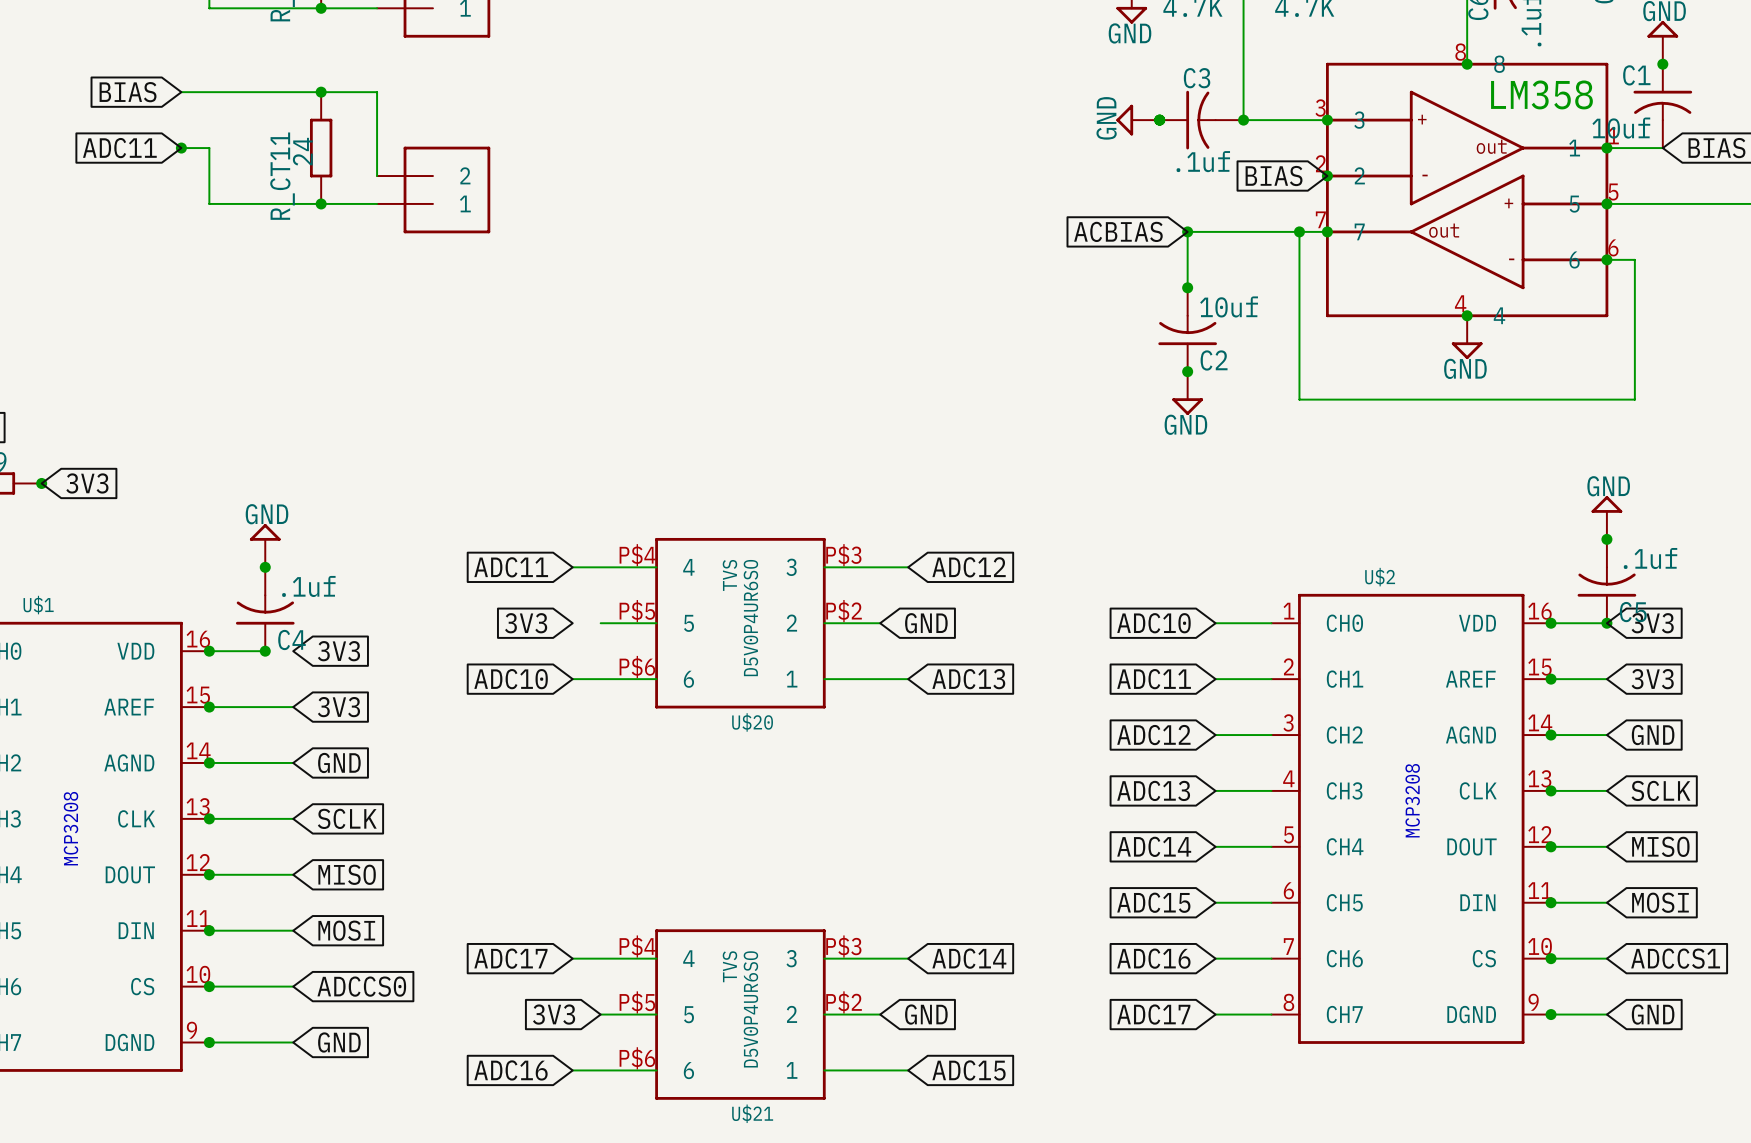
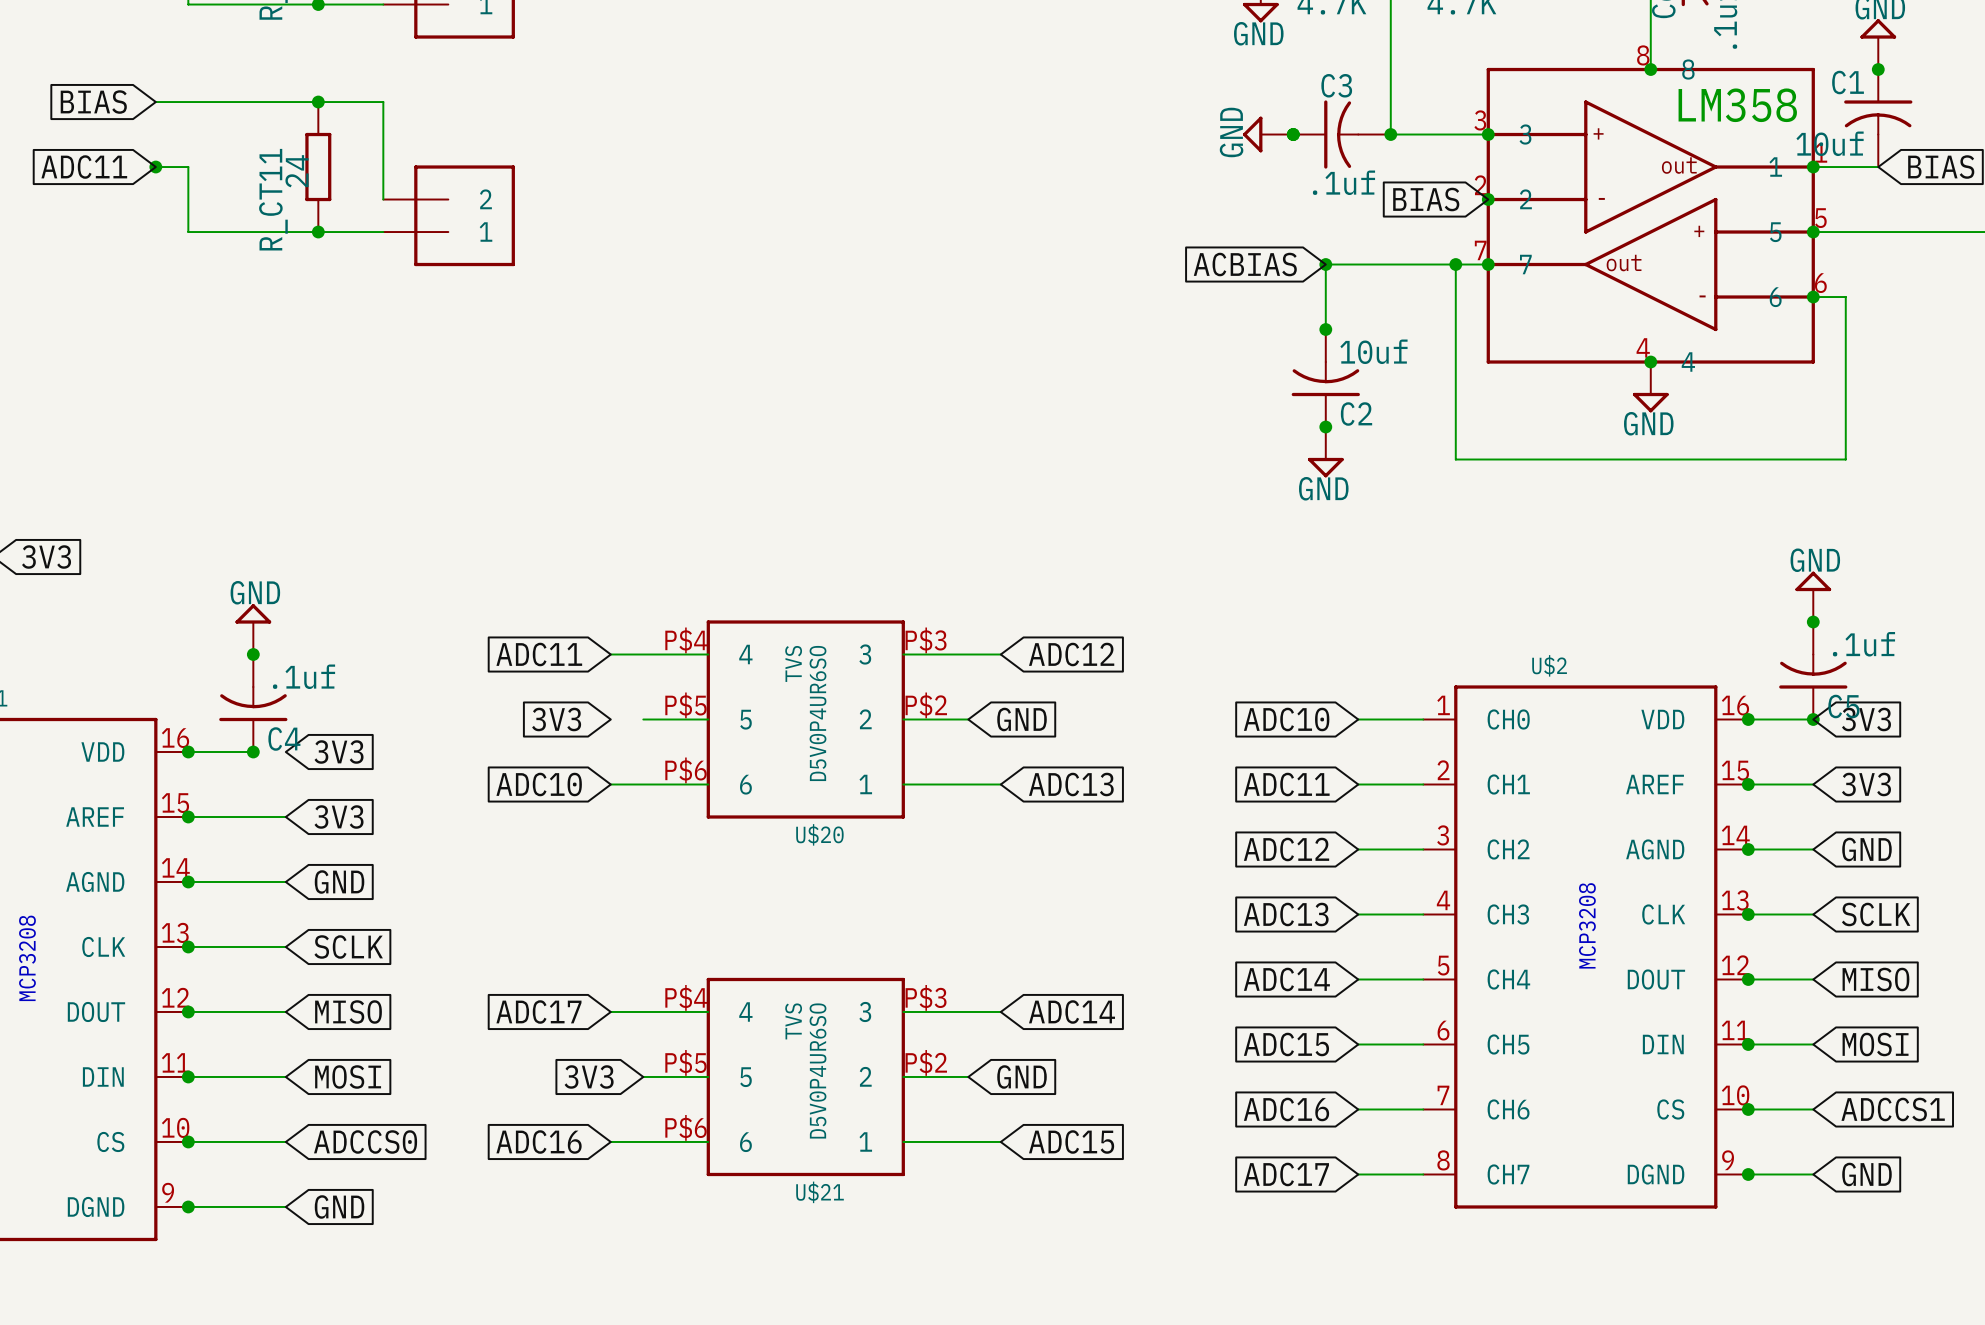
global label position: ADC17 (510, 958) -> ADC17 (538, 1011)
wire: (572, 958) (656, 958) -> (610, 1011) (708, 1011)
wire: (824, 958) (908, 958) -> (903, 1011) (1000, 1011)
global label position: ADC14 (969, 958) -> ADC14 (1072, 1011)
global label position: 3V3 (554, 1014) -> 3V3 (589, 1076)
wire: (600, 1014) (656, 1014) -> (643, 1076) (708, 1076)
U$21 position: (740, 1014) -> (805, 1076)
wire: (824, 1014) (880, 1014) -> (903, 1076) (968, 1076)
global label position: GND (926, 1014) -> GND (1022, 1076)
global label position: ADC16 (510, 1070) -> ADC16 (539, 1141)
wire: (572, 1070) (656, 1070) -> (610, 1141) (708, 1141)
wire: (824, 1070) (908, 1070) -> (903, 1141) (1000, 1141)
global label position: ADC15 (969, 1070) -> ADC15 (1071, 1141)

